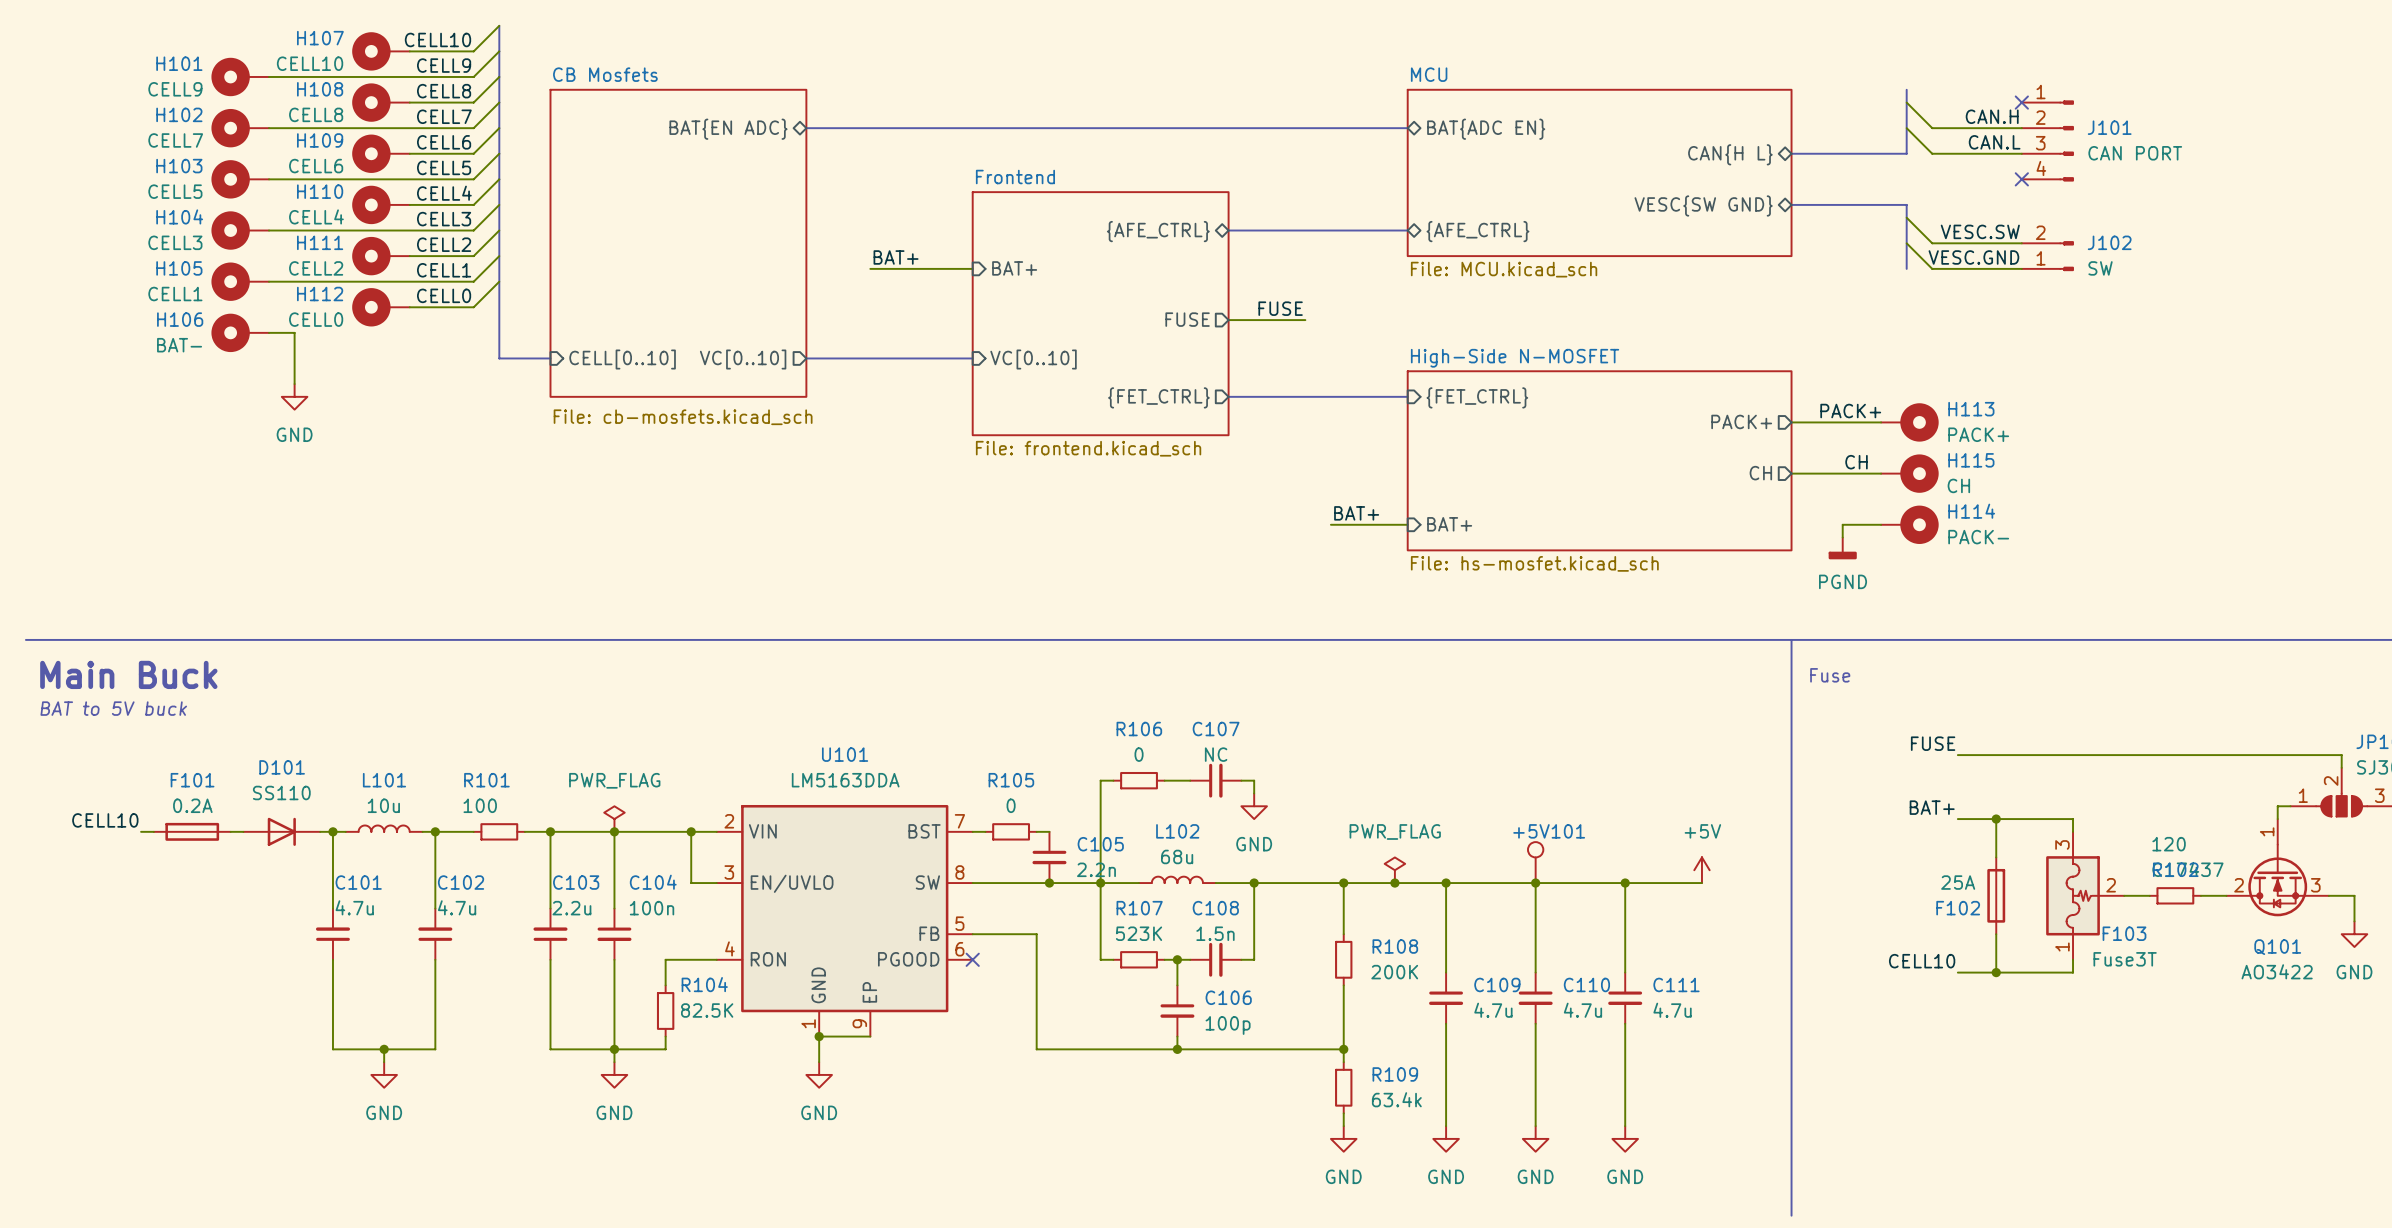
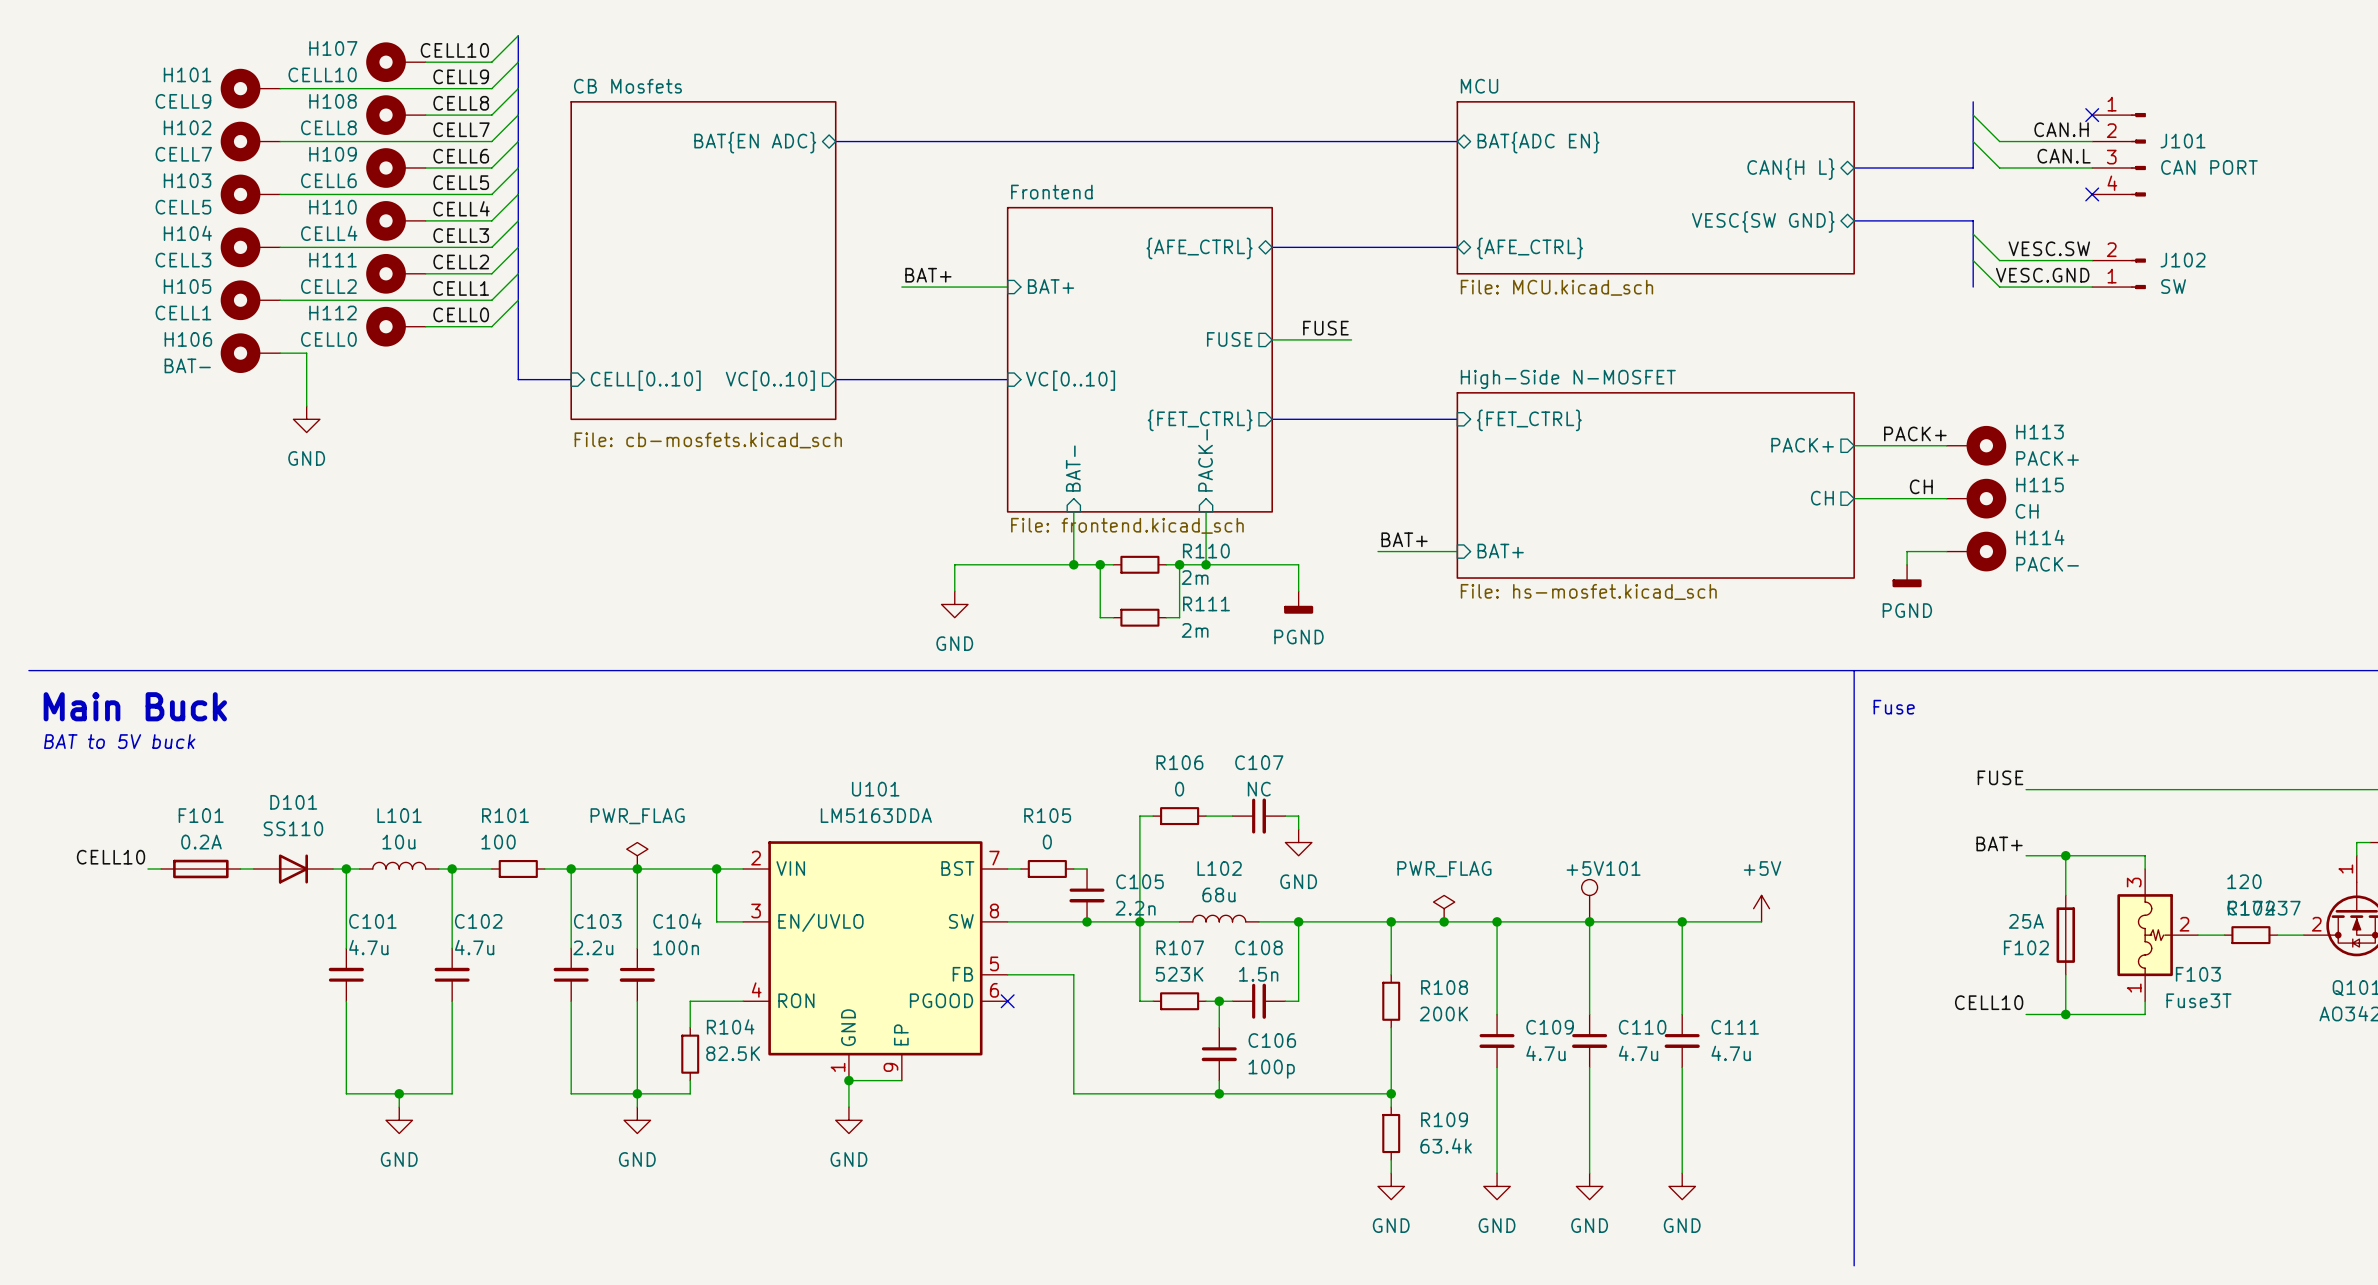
sheet Frontend: File: frontend.kicad_sch (1100, 313) -> none
sheet Frontend: none -> File: frontend.kicad_sch (1139, 359)
sheet pin: none -> PACK- (1205, 460)
sheet pin: none -> BAT- (1073, 468)
wire: none -> (1073, 511) (1073, 564)
wire: none -> (1206, 511) (1206, 564)
junction: none -> (1073, 564)
wire: none -> (1100, 564) (1100, 617) (1113, 617)
junction: none -> (1100, 564)
wire: none -> (1113, 564) (954, 564) (954, 591)
R110: none -> 2m (1139, 564)
wire: none -> (1166, 564) (1298, 564) (1298, 591)
wire: none -> (1179, 564) (1179, 617) (1166, 617)
junction: none -> (1179, 564)
junction: none -> (1206, 564)
power symbol: none -> PGND (1298, 602)
power symbol: none -> GND (954, 604)
R111: none -> 2m (1139, 617)

